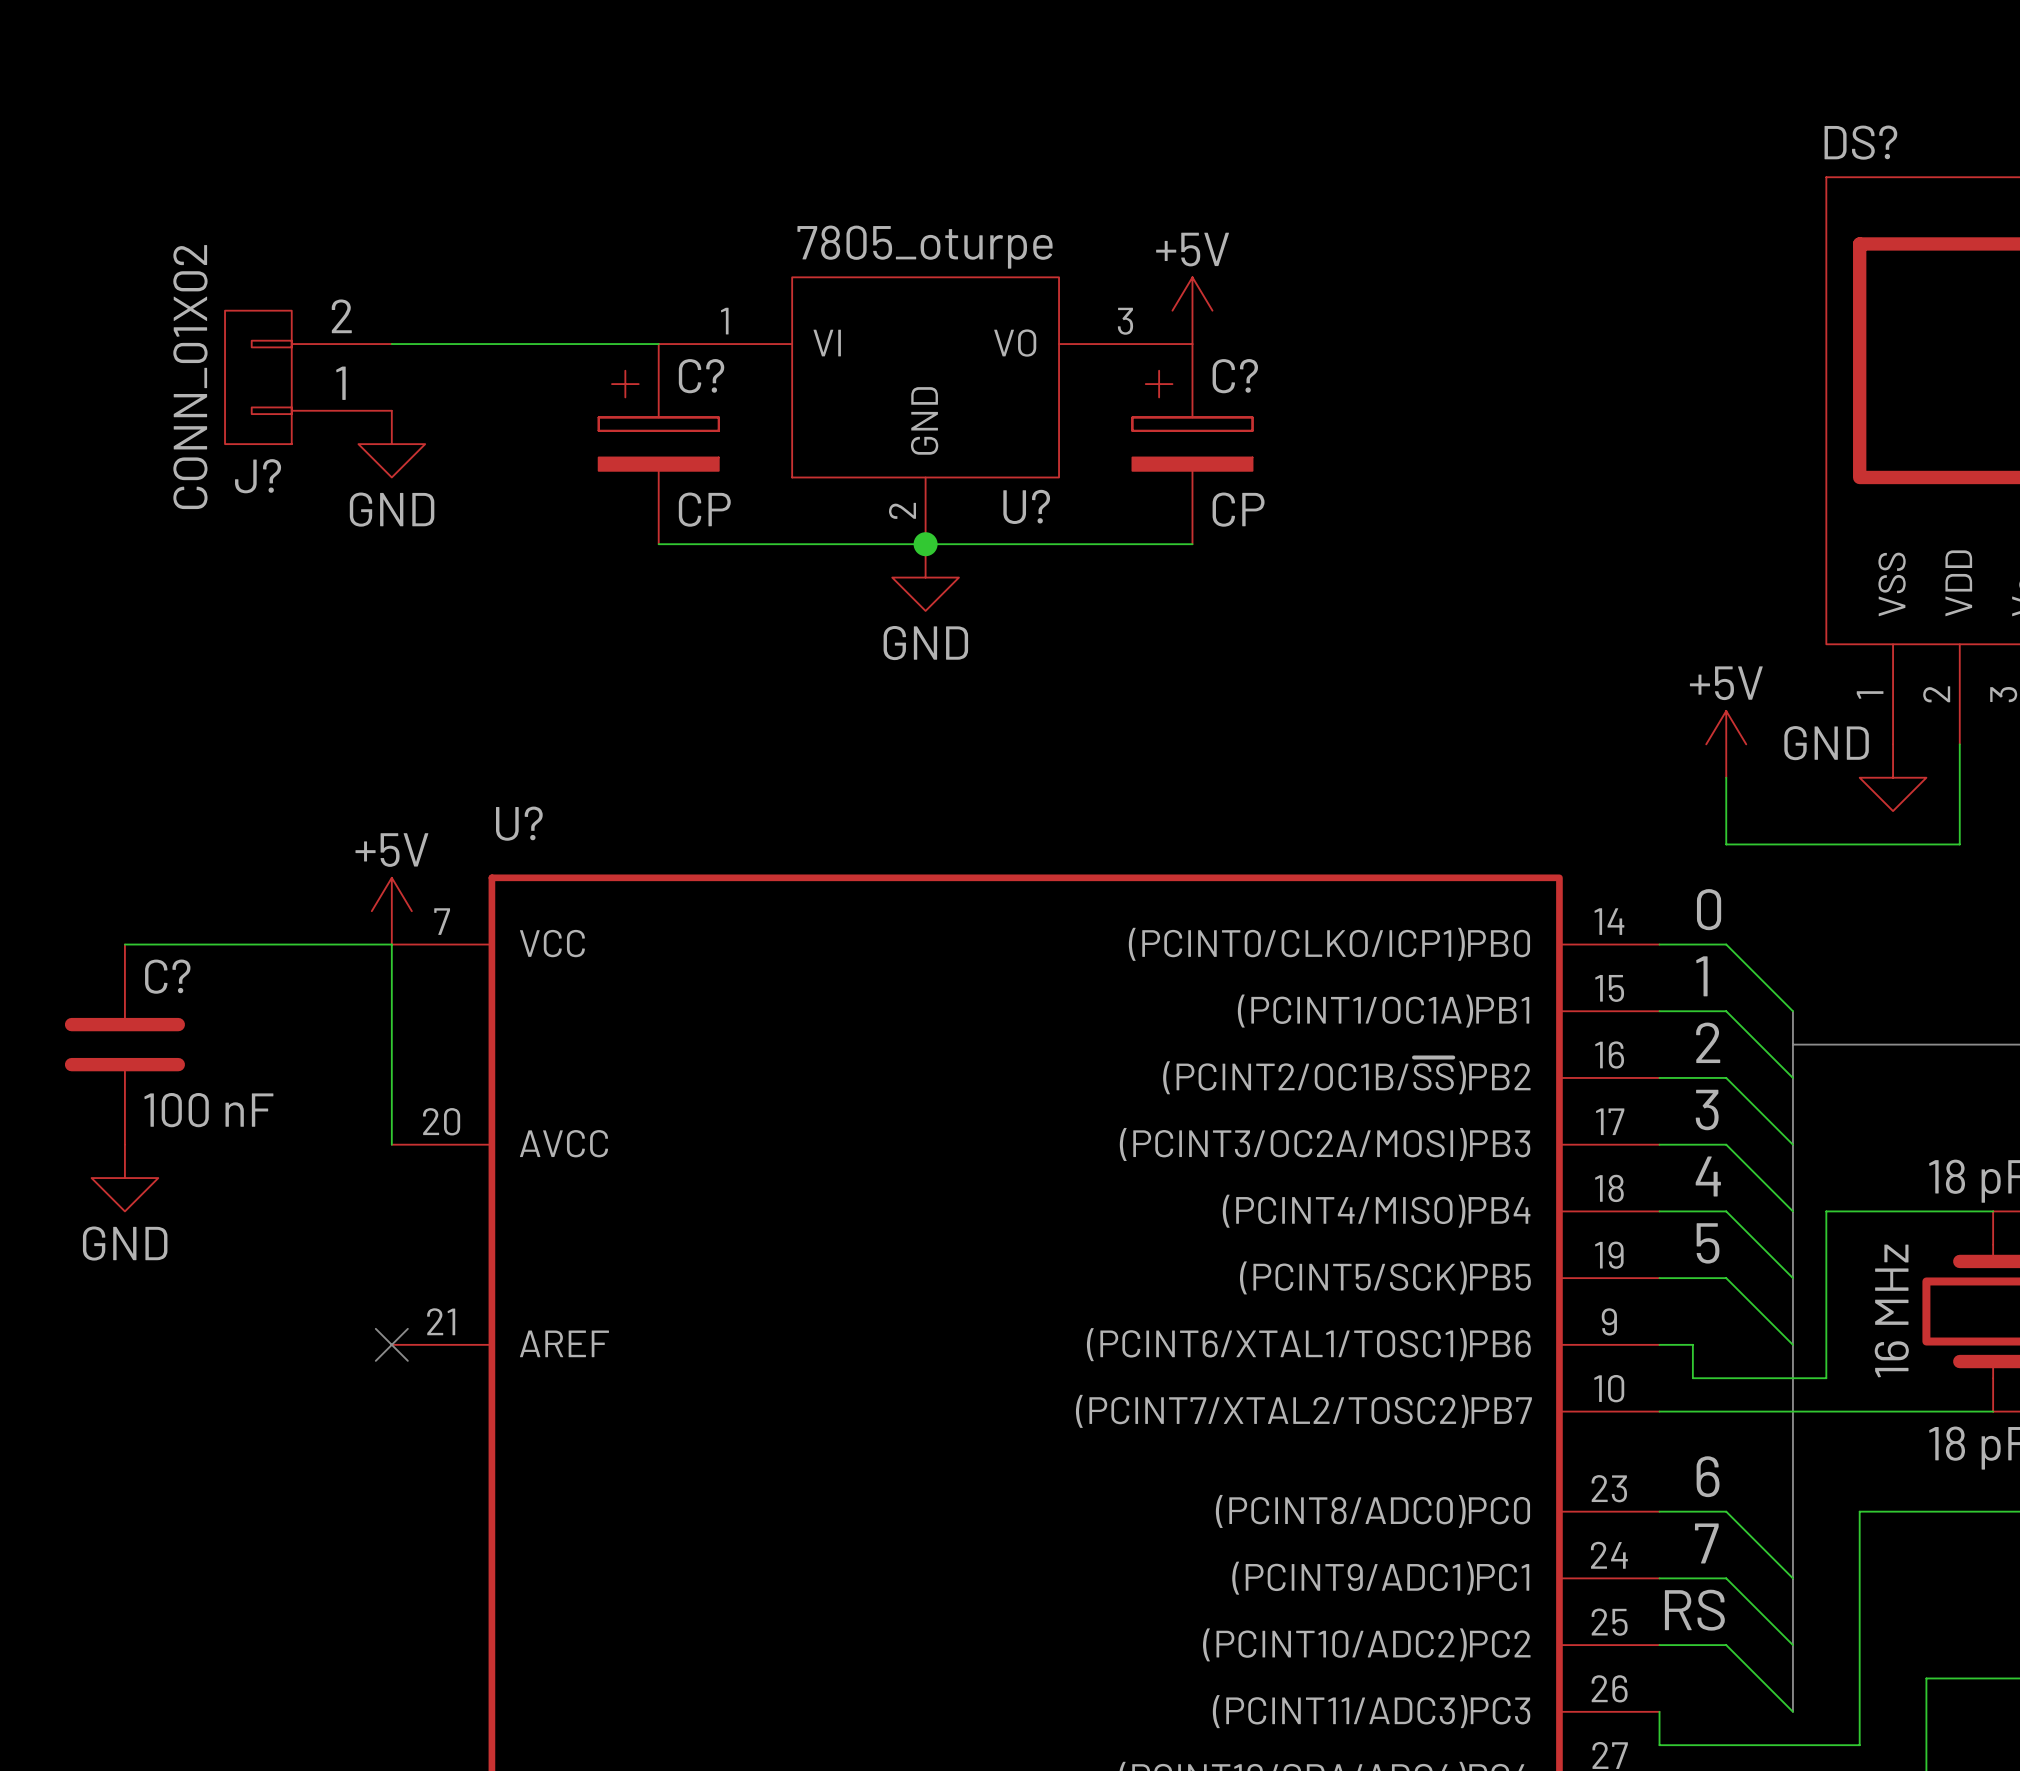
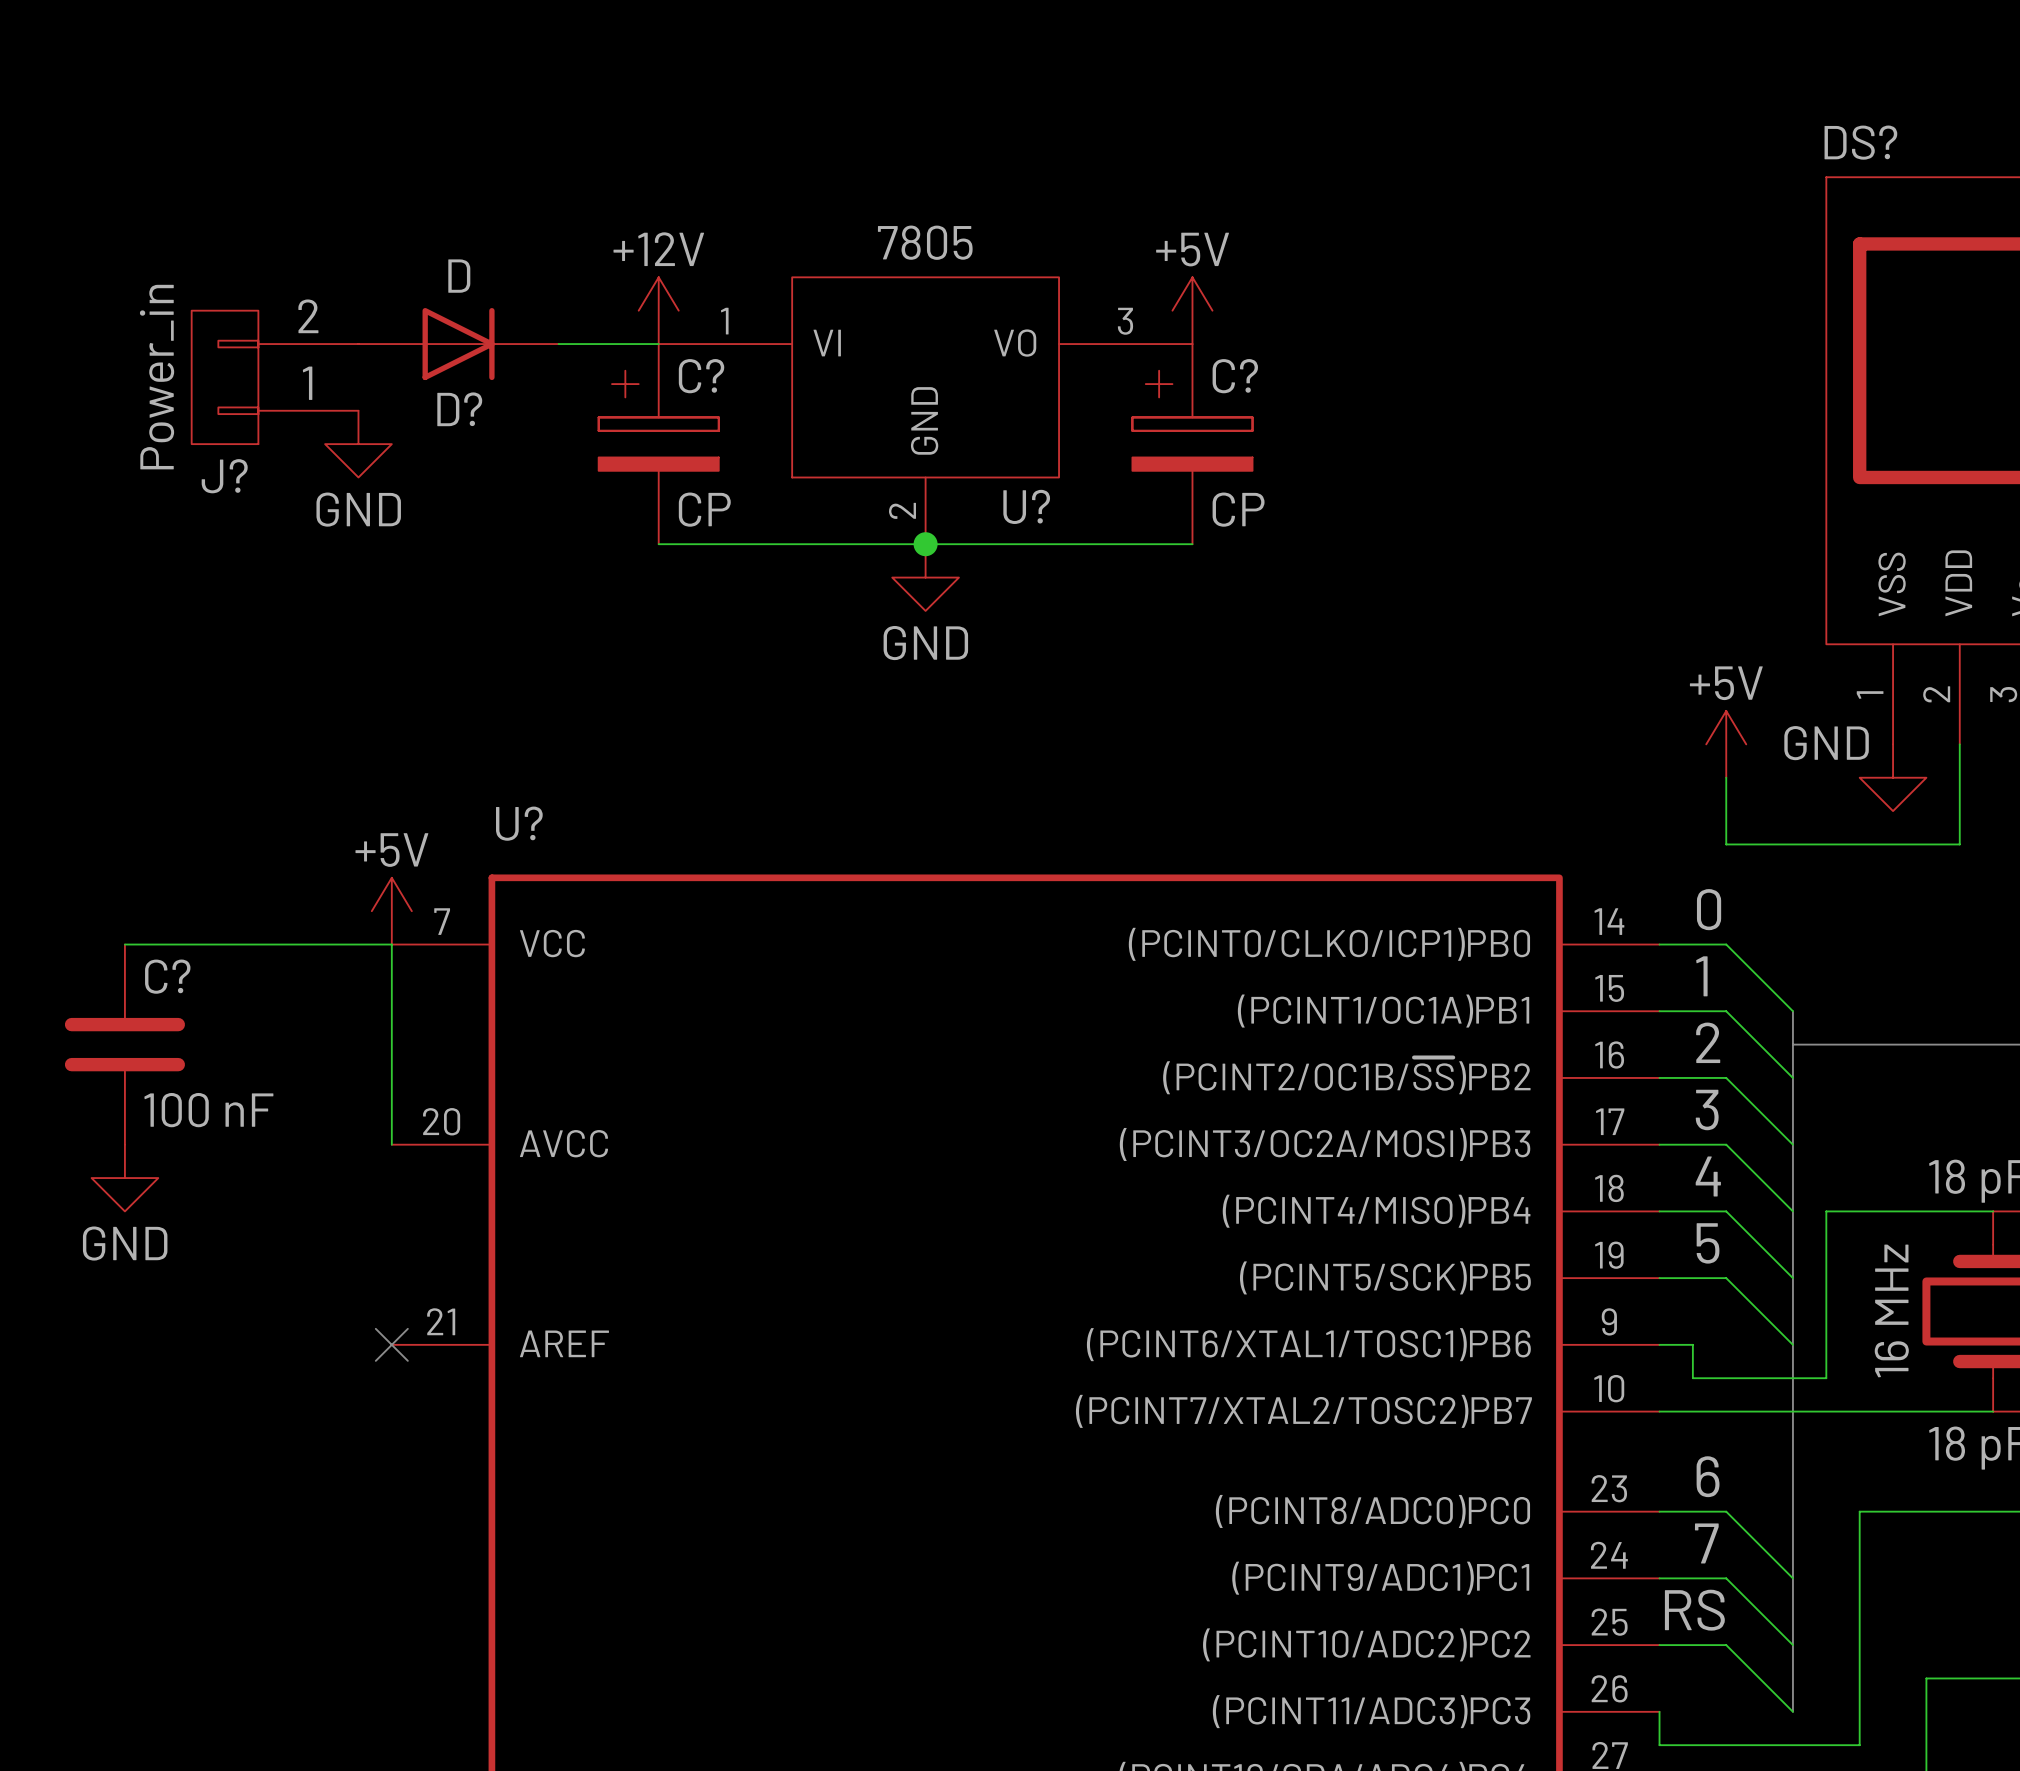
U? value: 7805_oturpe (925, 247) -> 7805 (925, 242)
power symbol: none -> +12V (658, 310)
D?: none -> D (458, 344)
J?: none -> Power_in (275, 377)
J?: CONN_01X02 (308, 377) -> none
power symbol position: GND (391, 444) -> GND (358, 444)

